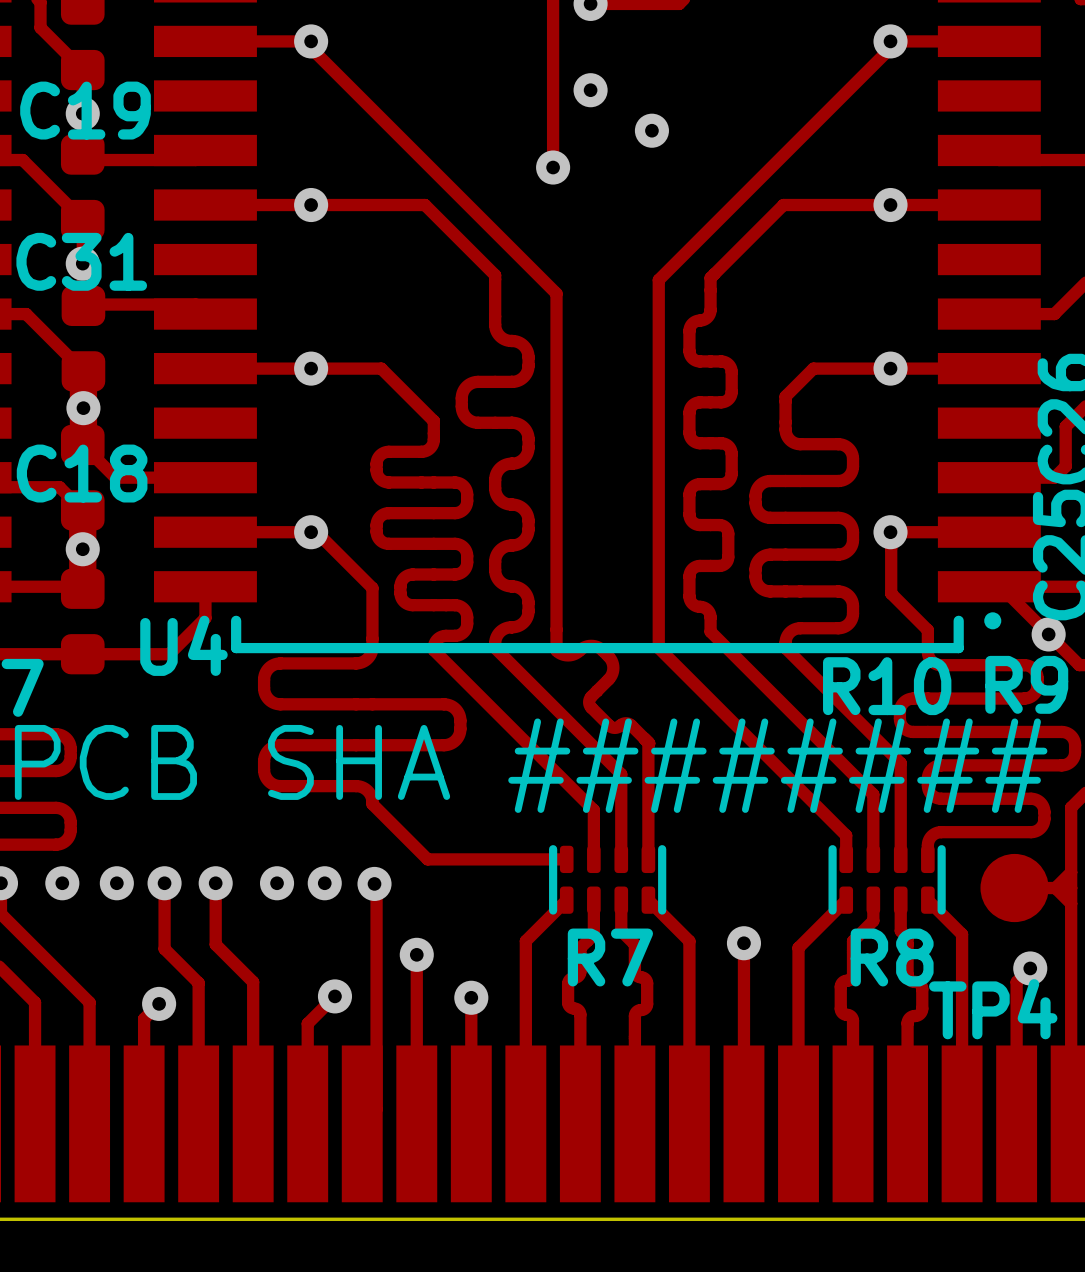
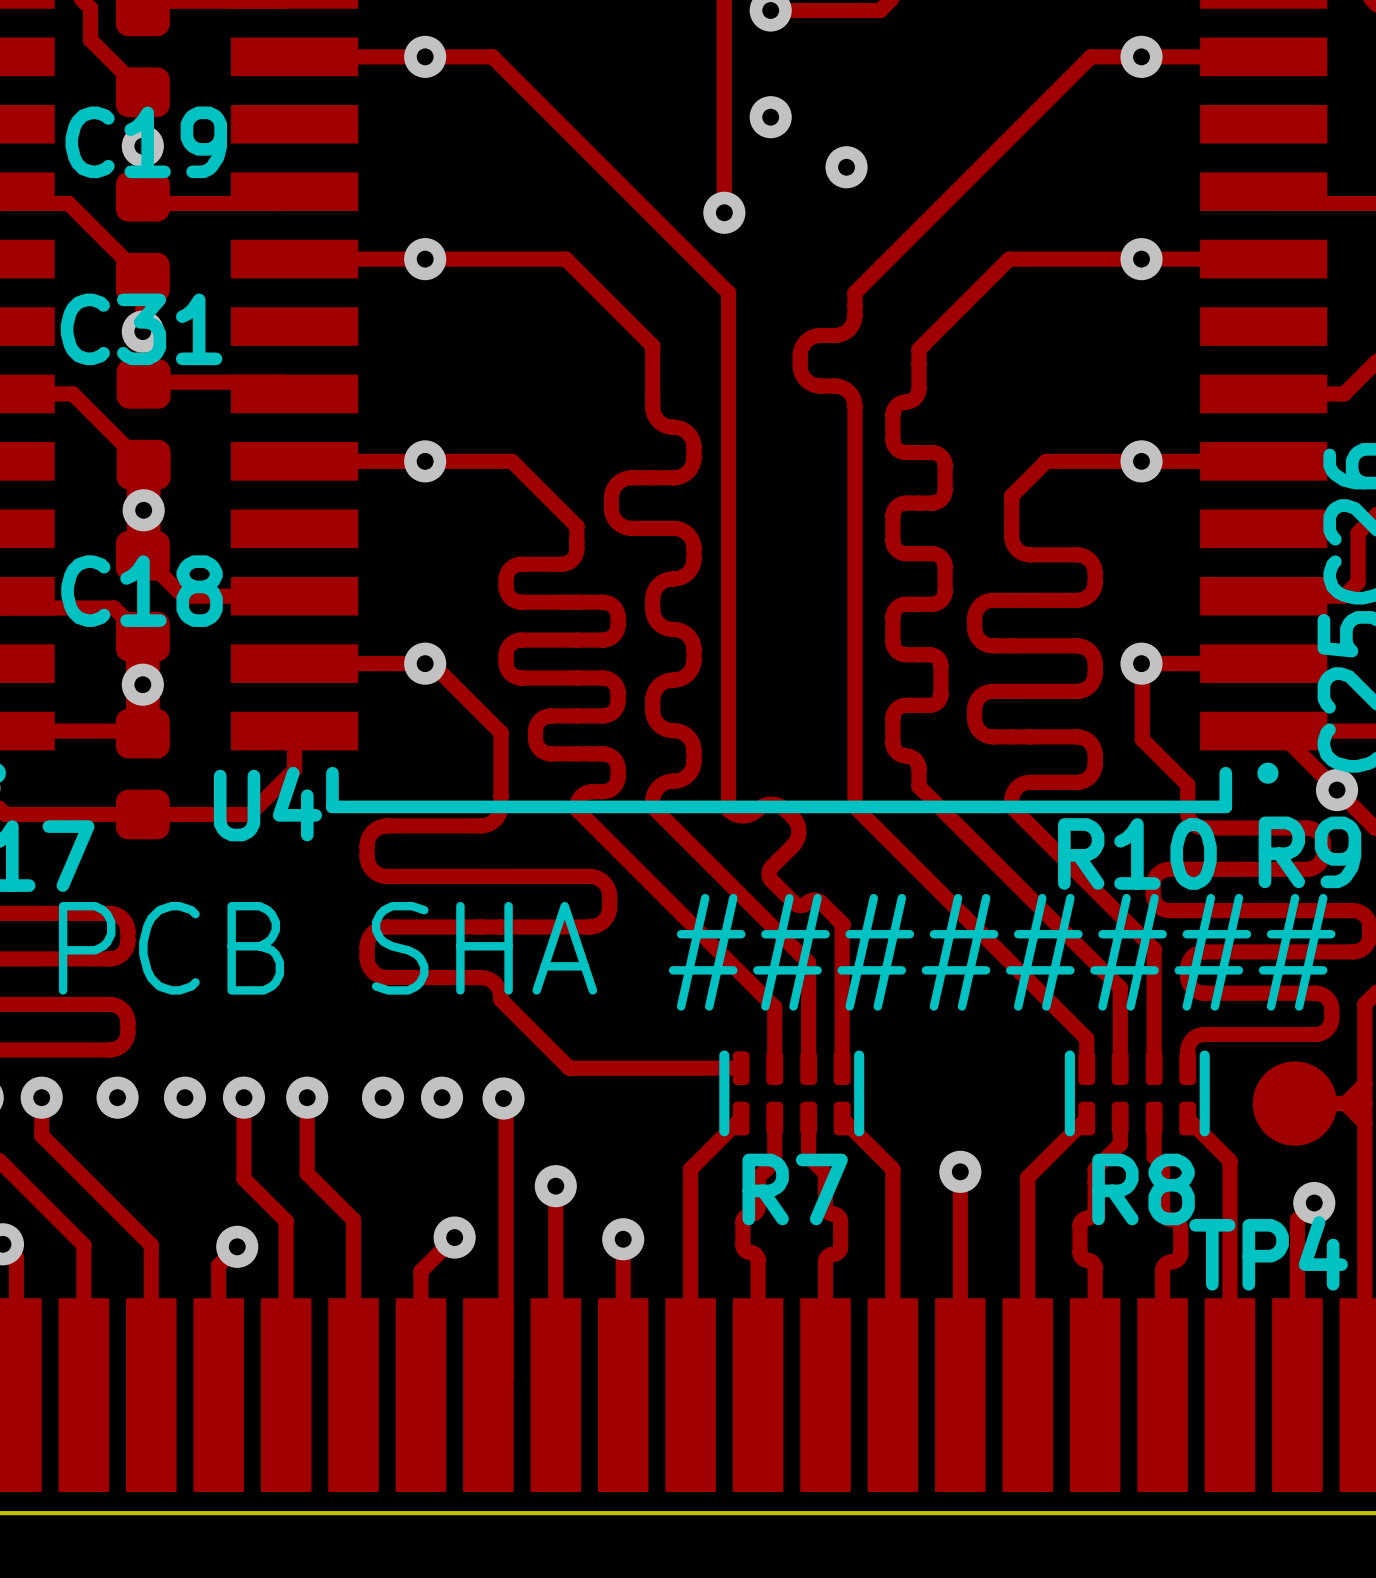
track: (311, 41) (311, 48) (556, 293) -> (425, 56) (492, 56) (728, 292) (728, 368)
track: (897, 41) (658, 280) (658, 324) -> (1149, 56) (1090, 56) (854, 292) (854, 317) (849, 329) (839, 334) (813, 336) (804, 343) (800, 355) (800, 370) (804, 378) (815, 385) (837, 386) (845, 389) (852, 397) (854, 406)

